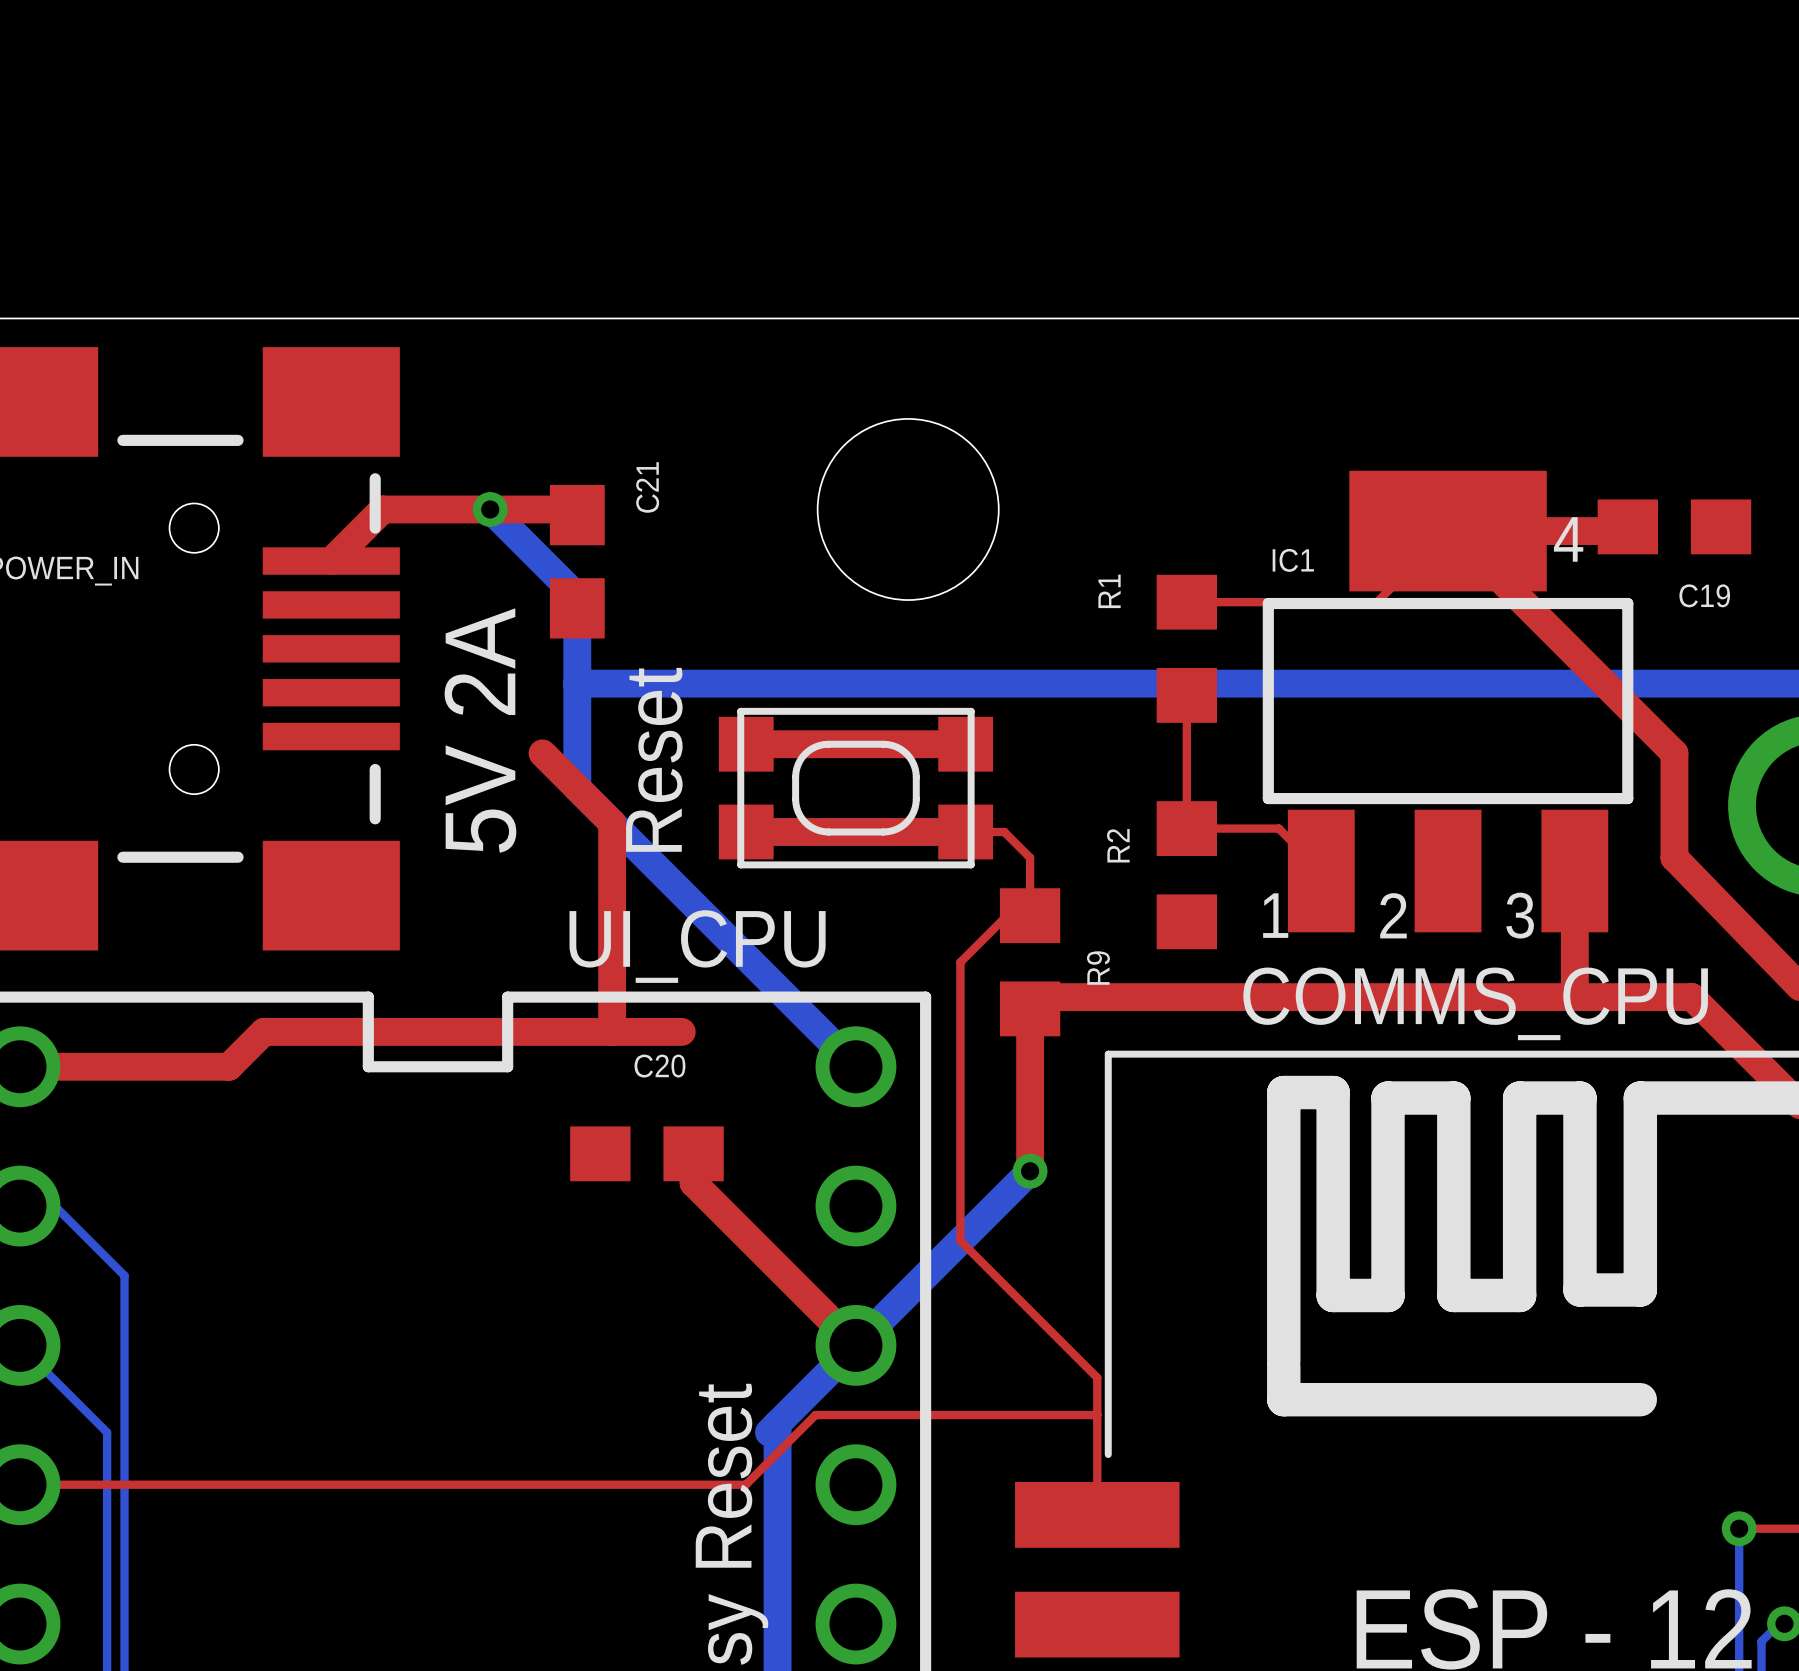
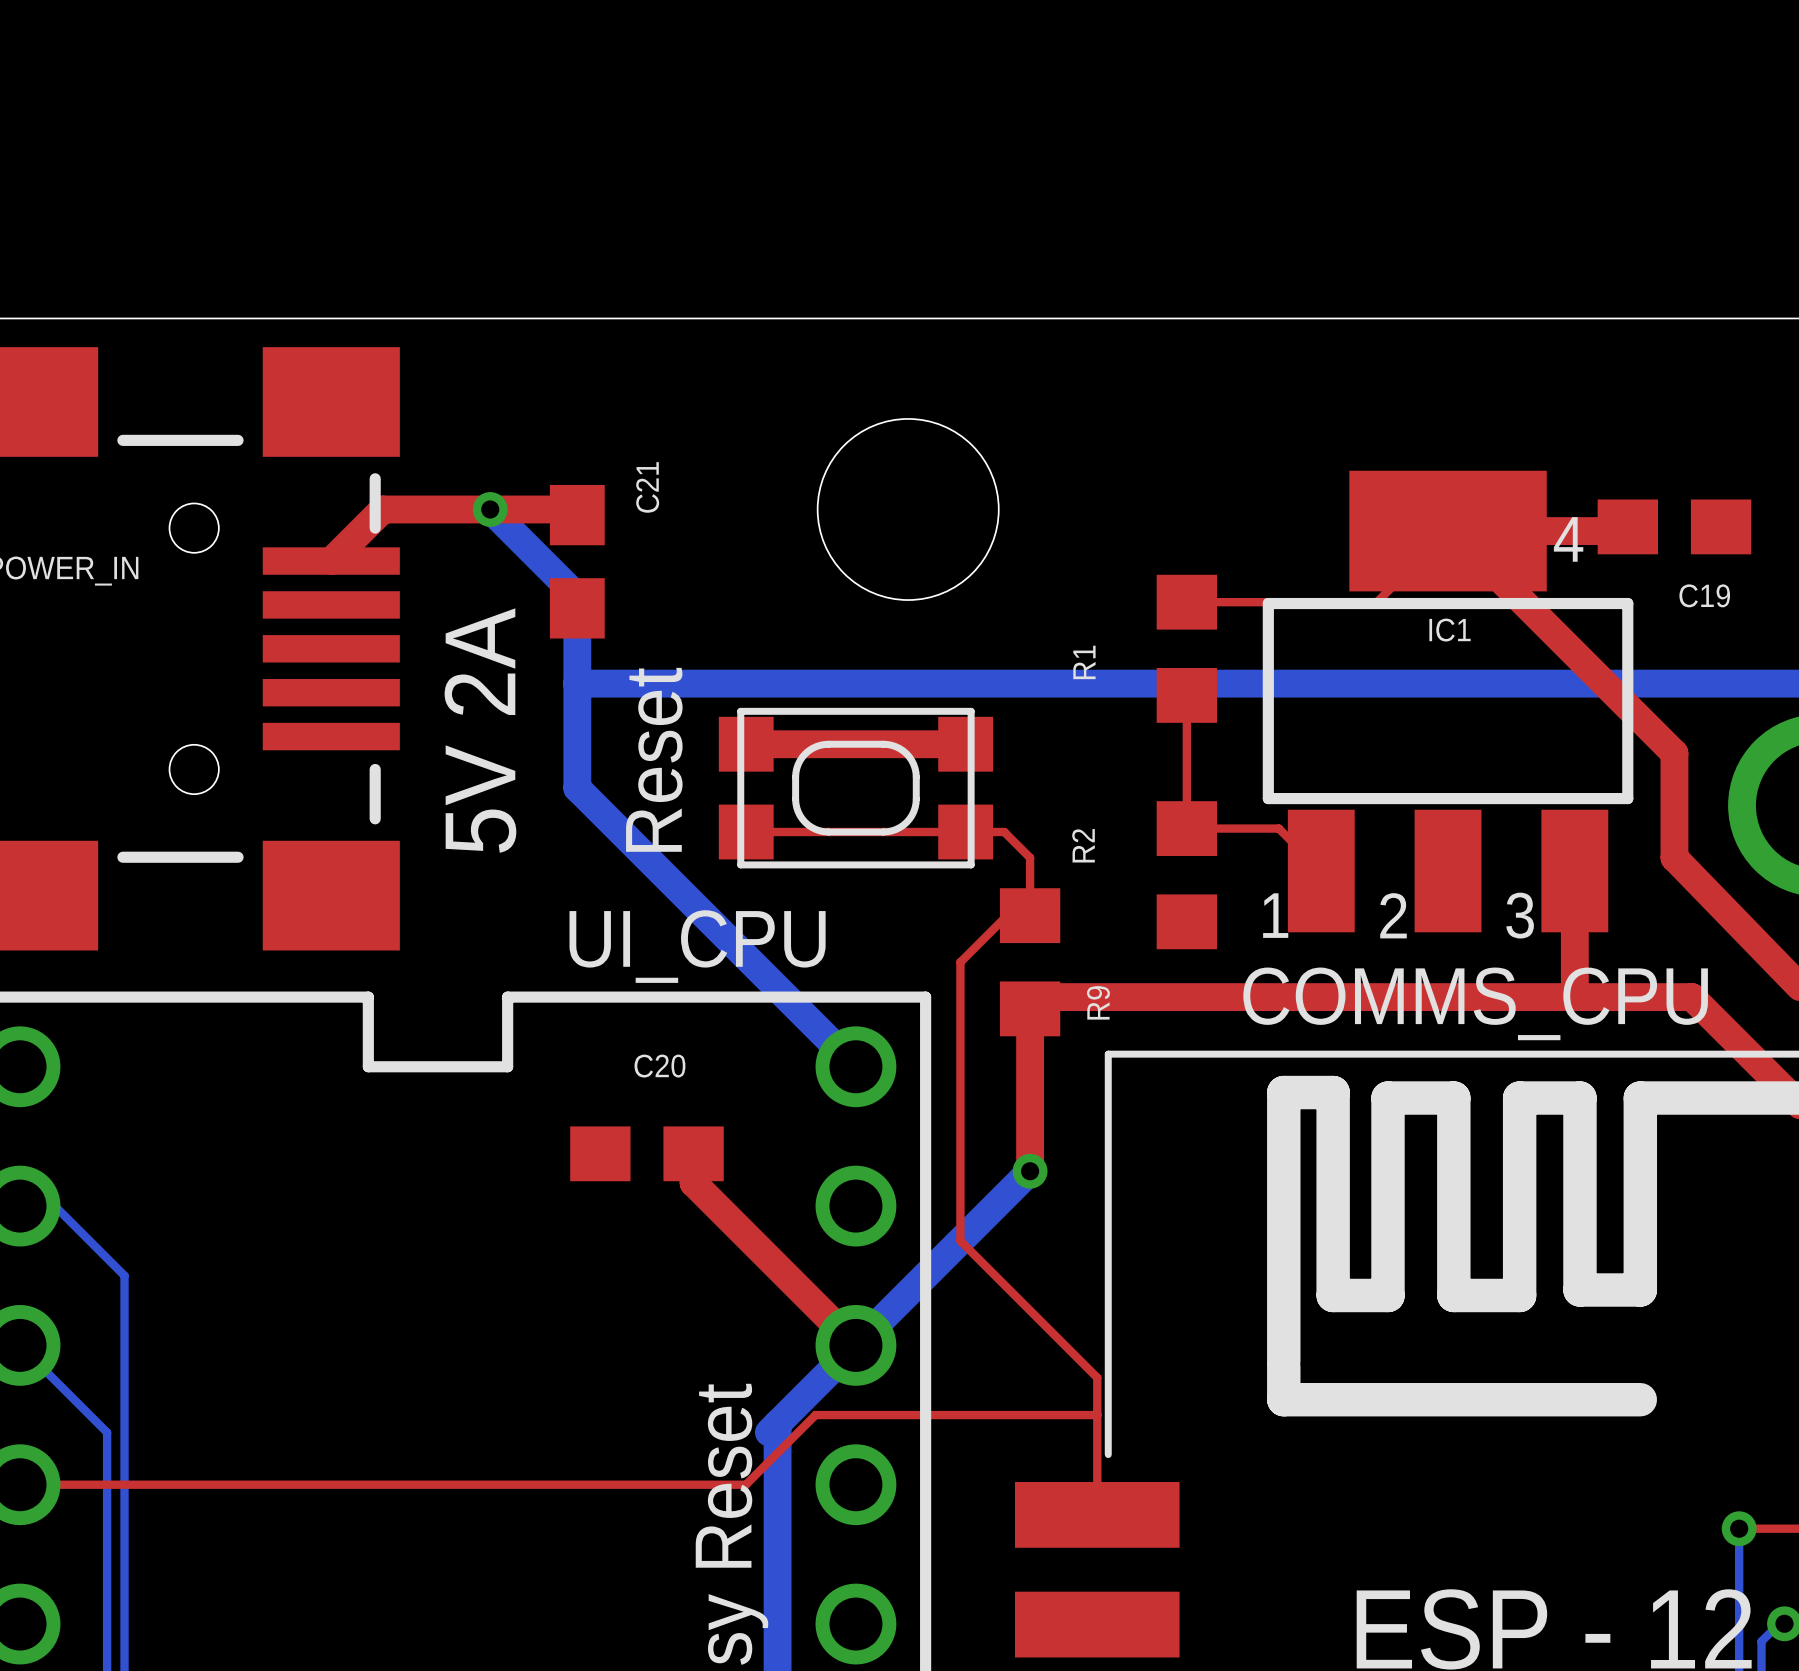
IC1 name position: IC1 (1293, 560) -> IC1 (1450, 630)
R1 name position: R1 (1109, 591) -> R1 (1084, 662)
top track: (542, 753) (612, 822) (612, 1031) -> none
top track width: thick (746, 832) (965, 832) -> thin (746, 832) (965, 832)
R2 name position: R2 (1118, 845) -> R2 (1083, 845)
R9 name position: R9 (1098, 968) -> R9 (1098, 1002)
top track: (681, 1031) (263, 1031) (229, 1066) (20, 1066) -> none

